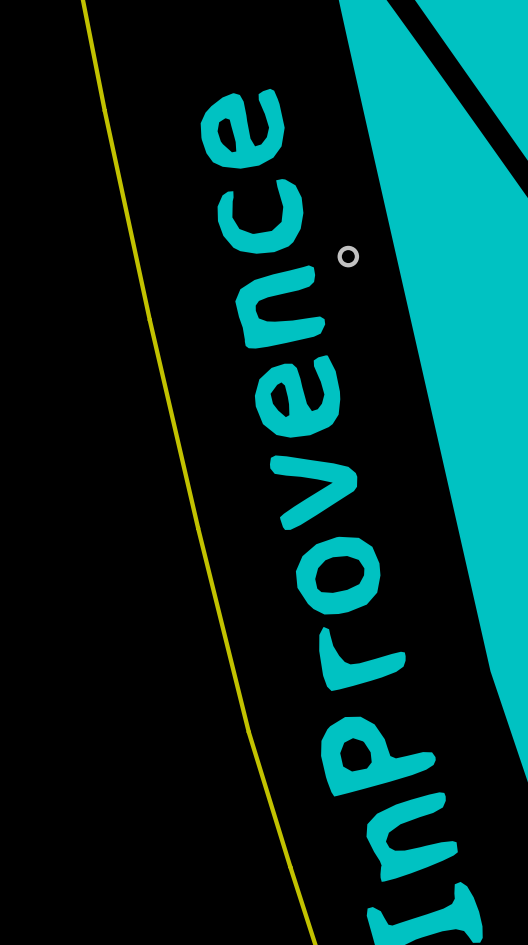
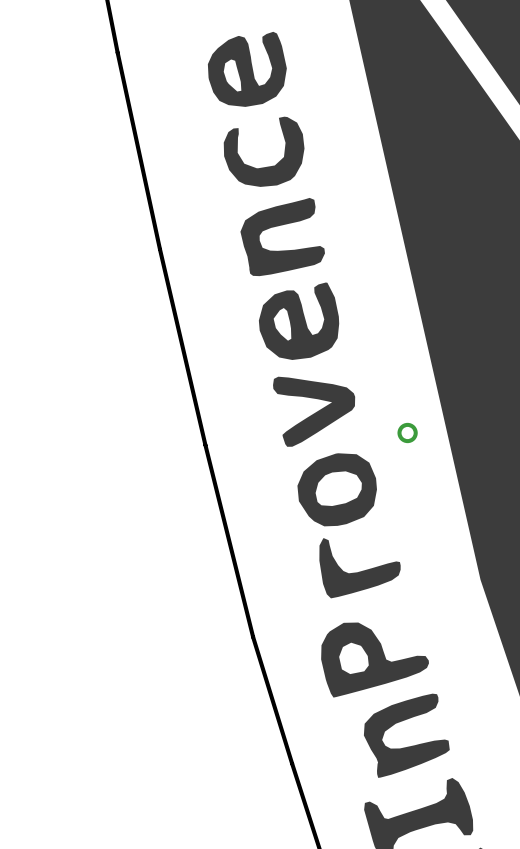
via: (348, 256) -> none
via: none -> (407, 432)

